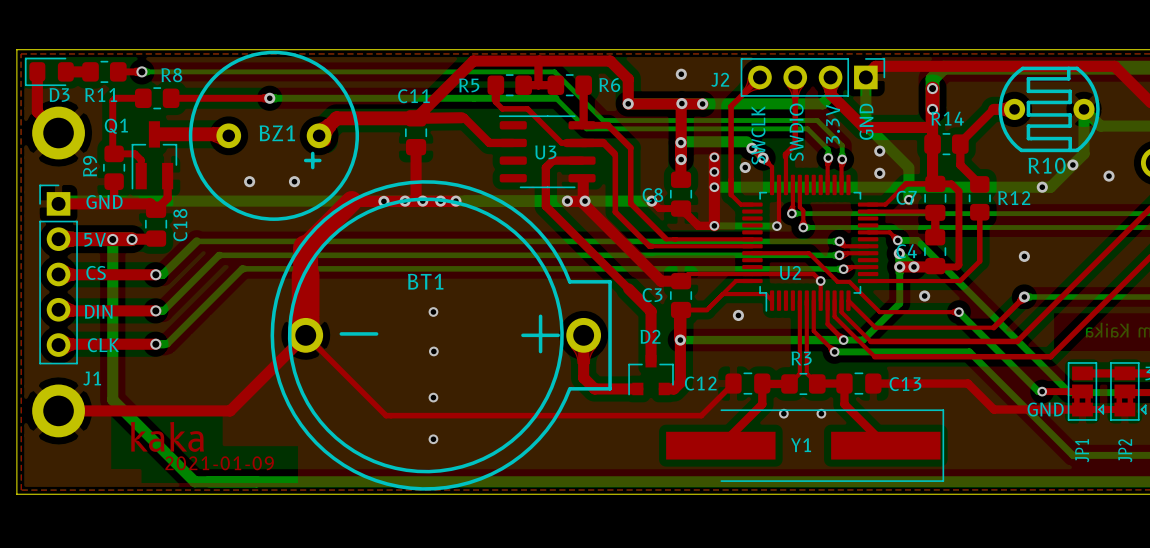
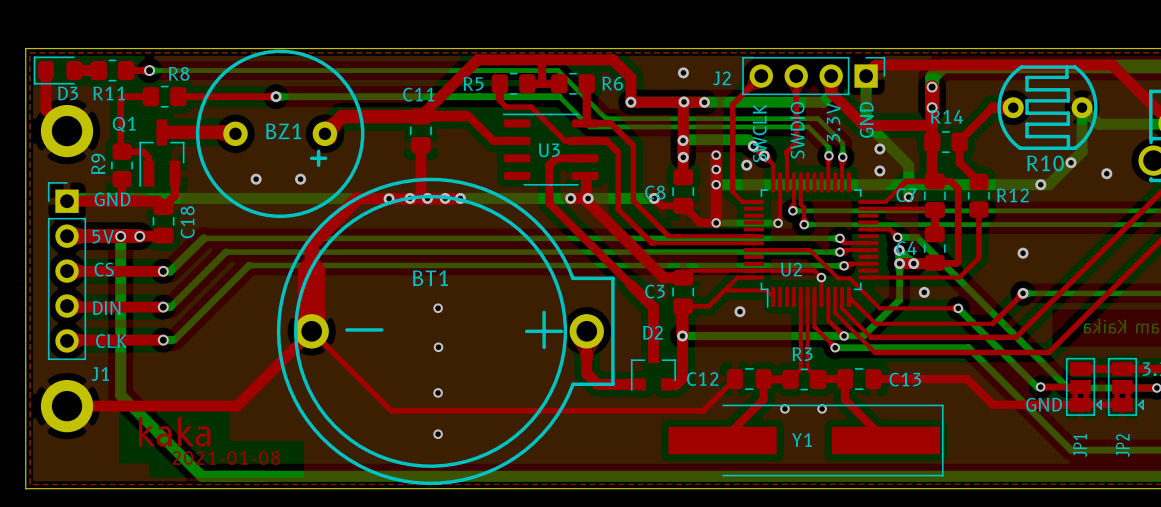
top track width: thick (351, 201) (305, 247) (305, 275) -> thin (357, 198) (311, 244) (311, 271)
text: 2021-01-09 (219, 463) -> 2021-01-08 (226, 457)

